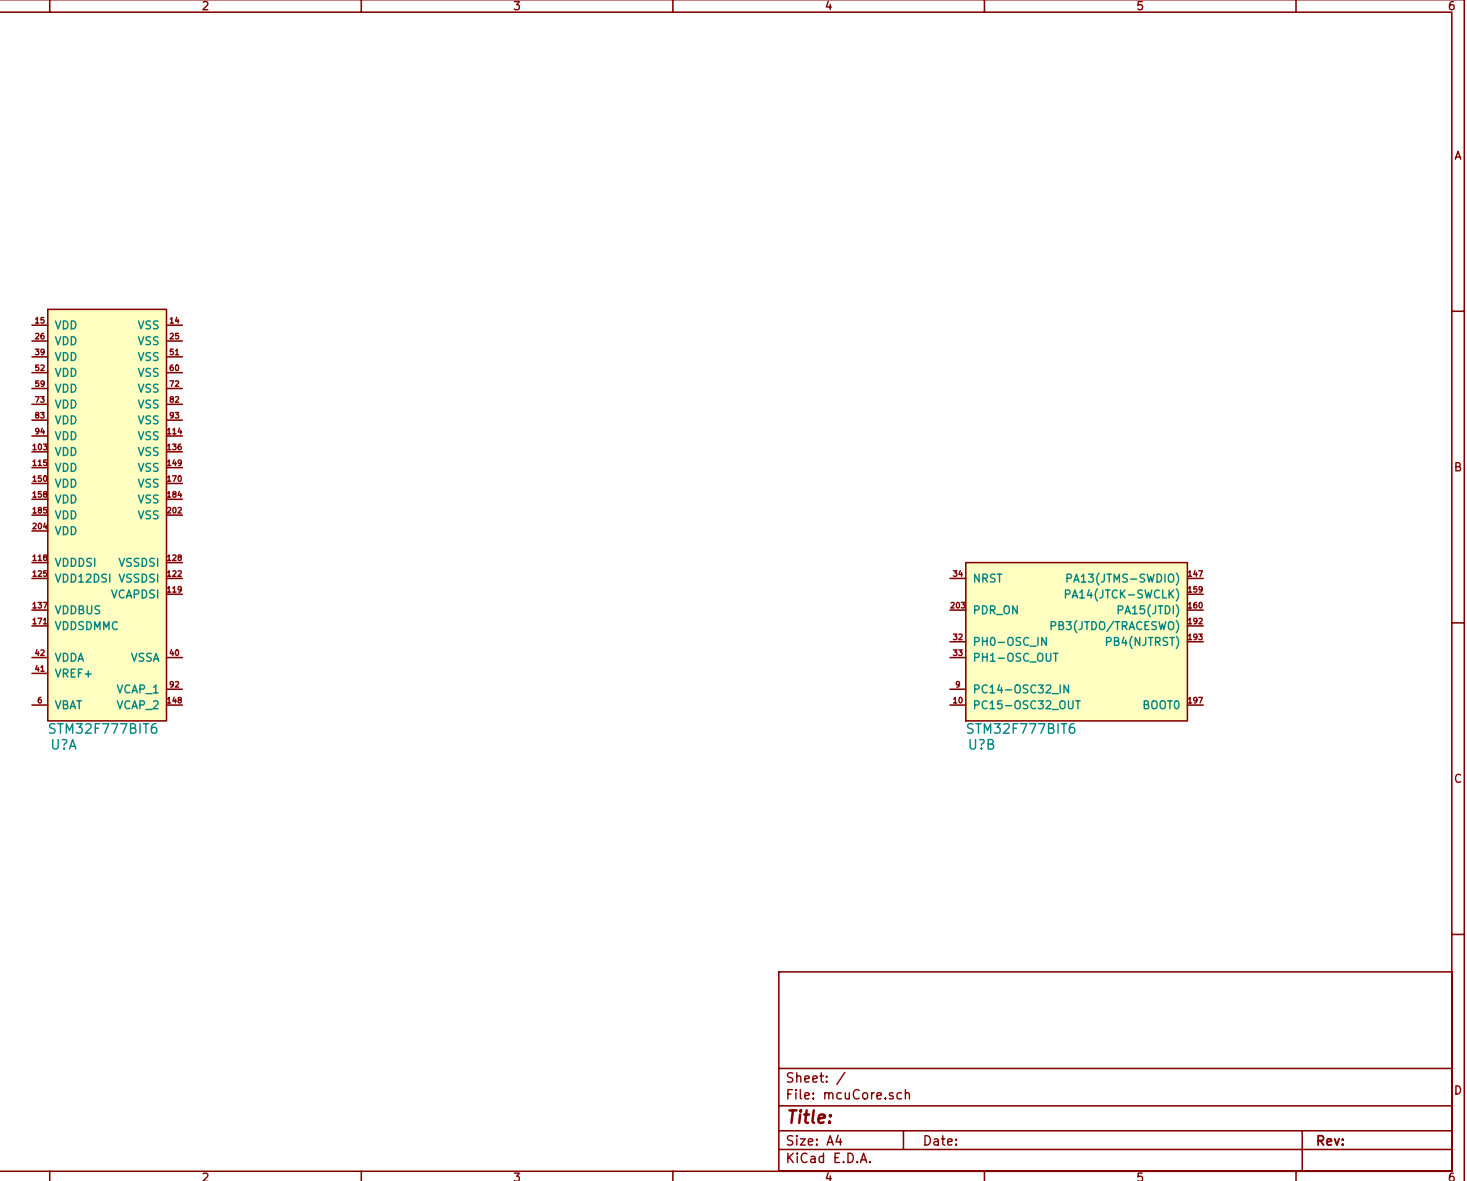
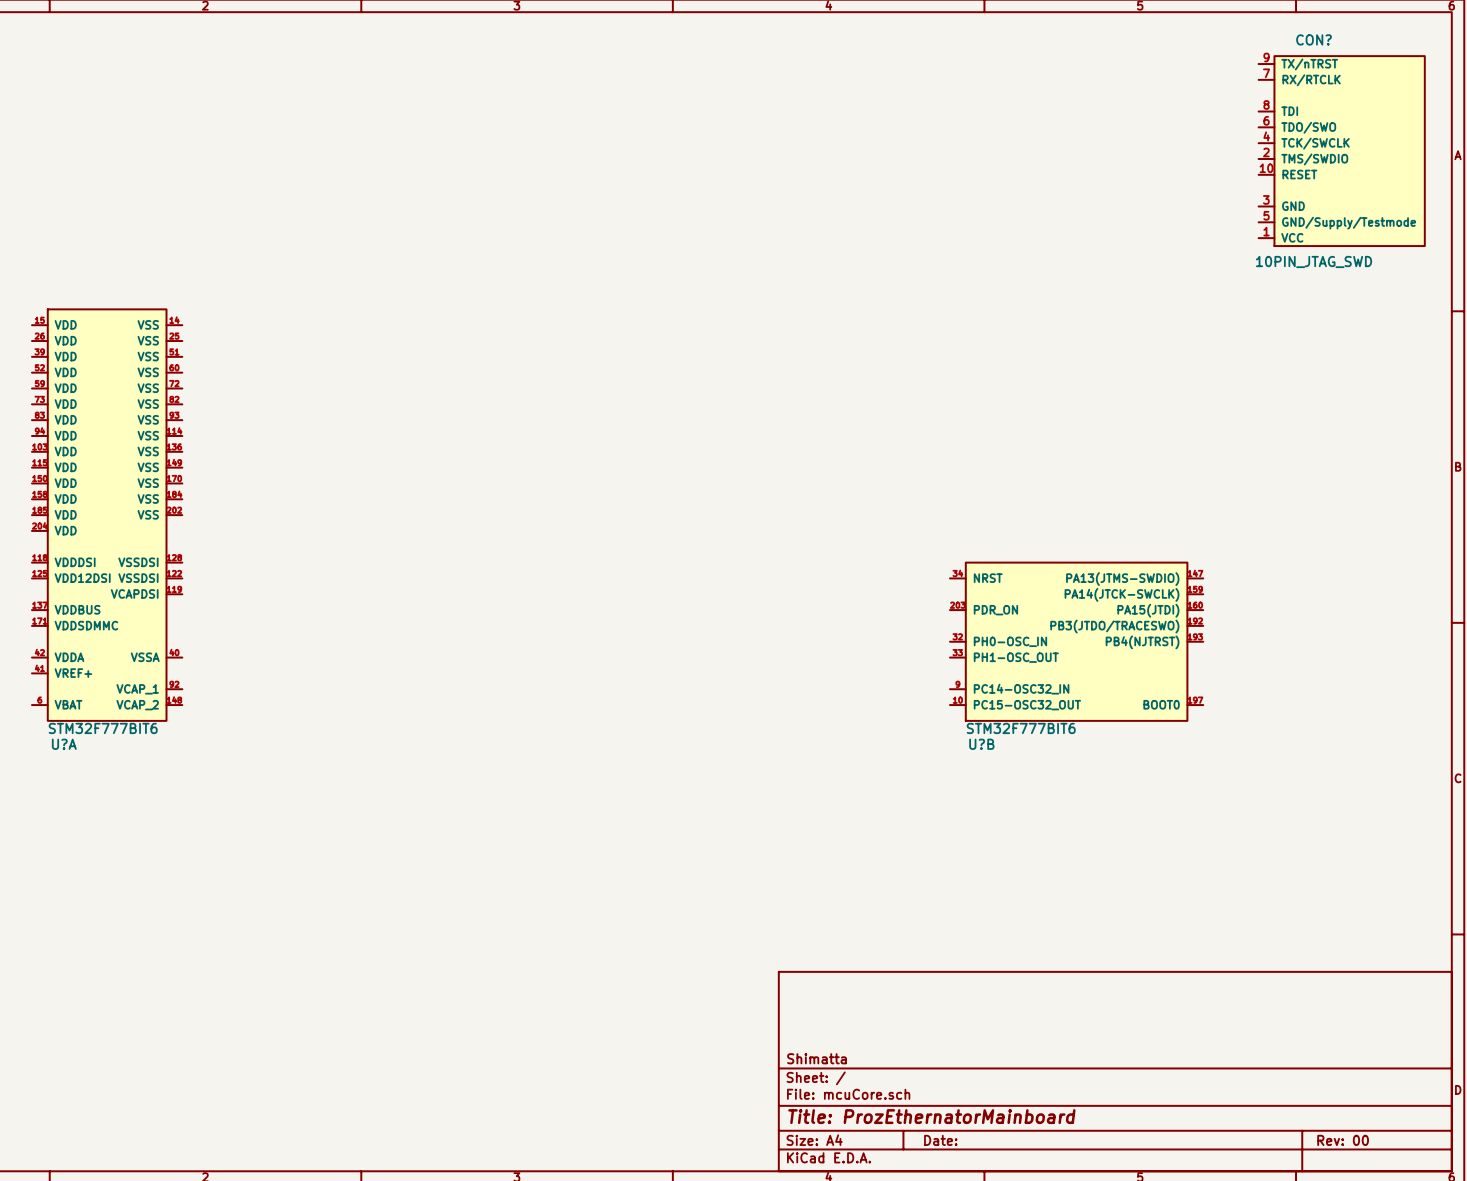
CON?: none -> 10PIN_JTAG_SWD (1341, 151)
title block: none -> Shimatta (816, 1058)
title block: Title: (810, 1116) -> Title: ProzEthernatorMainboard (931, 1116)
title block: Rev: (1330, 1140) -> Rev: 00 (1343, 1140)

